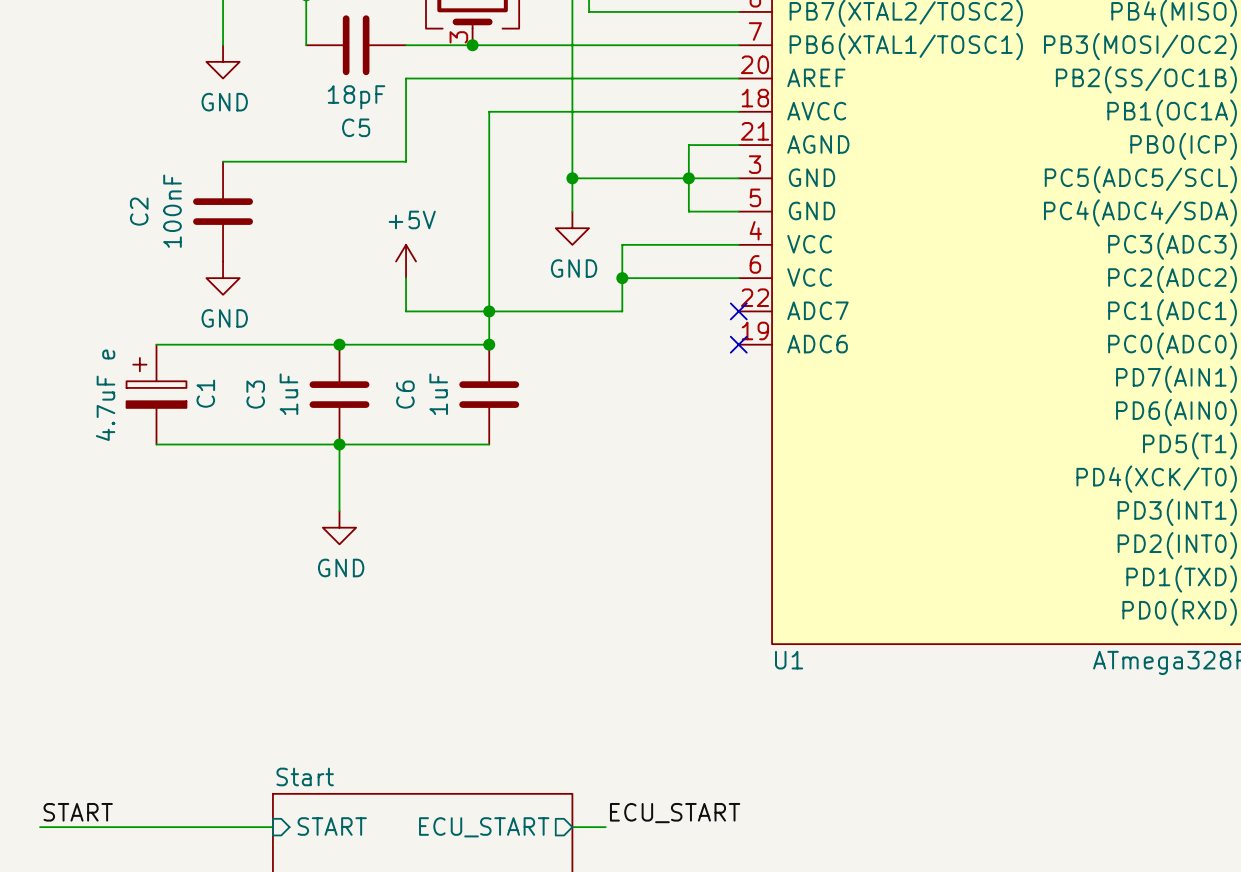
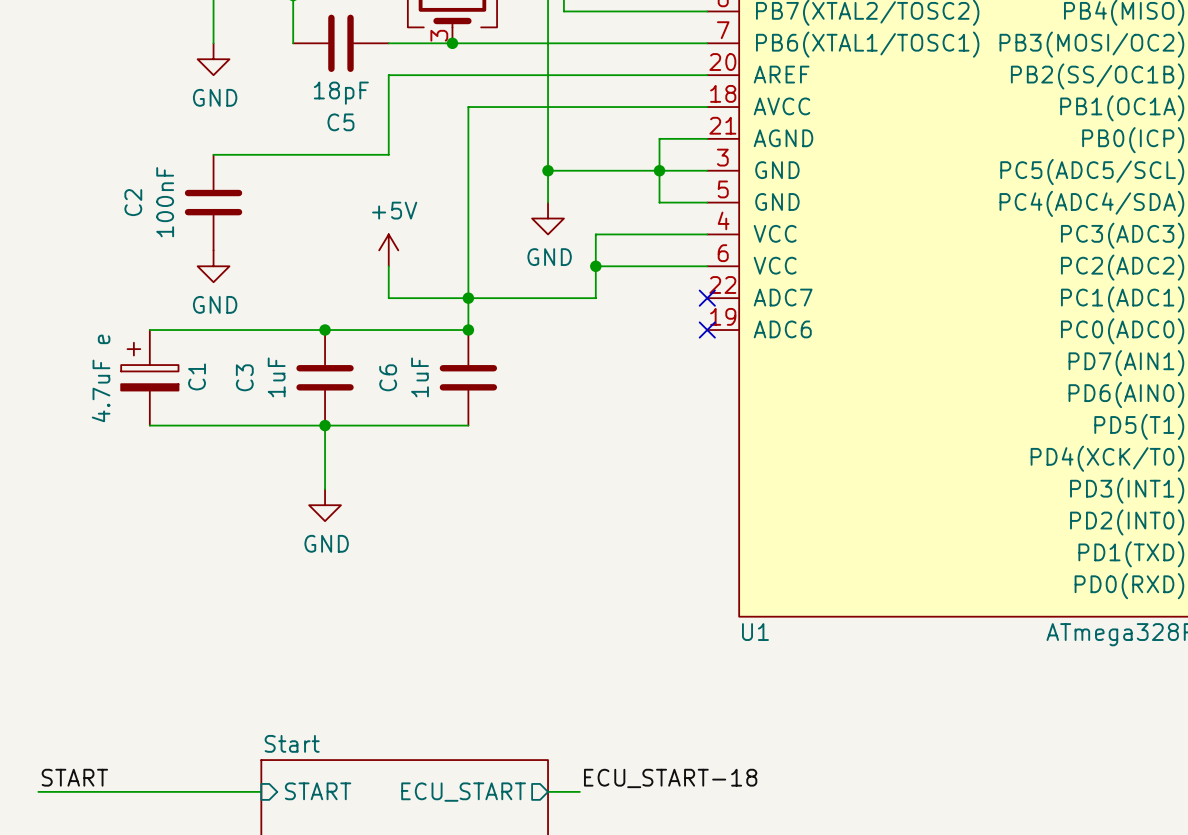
label: ECU_START (675, 813) -> ECU_START-18 (670, 778)

